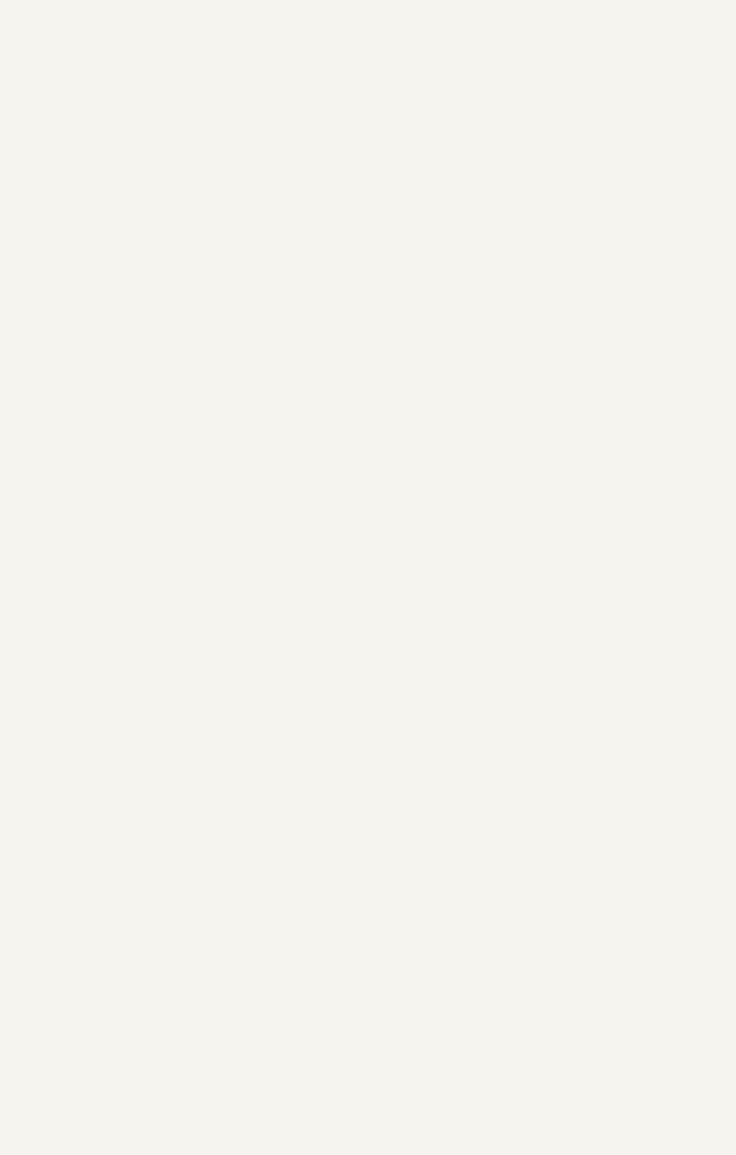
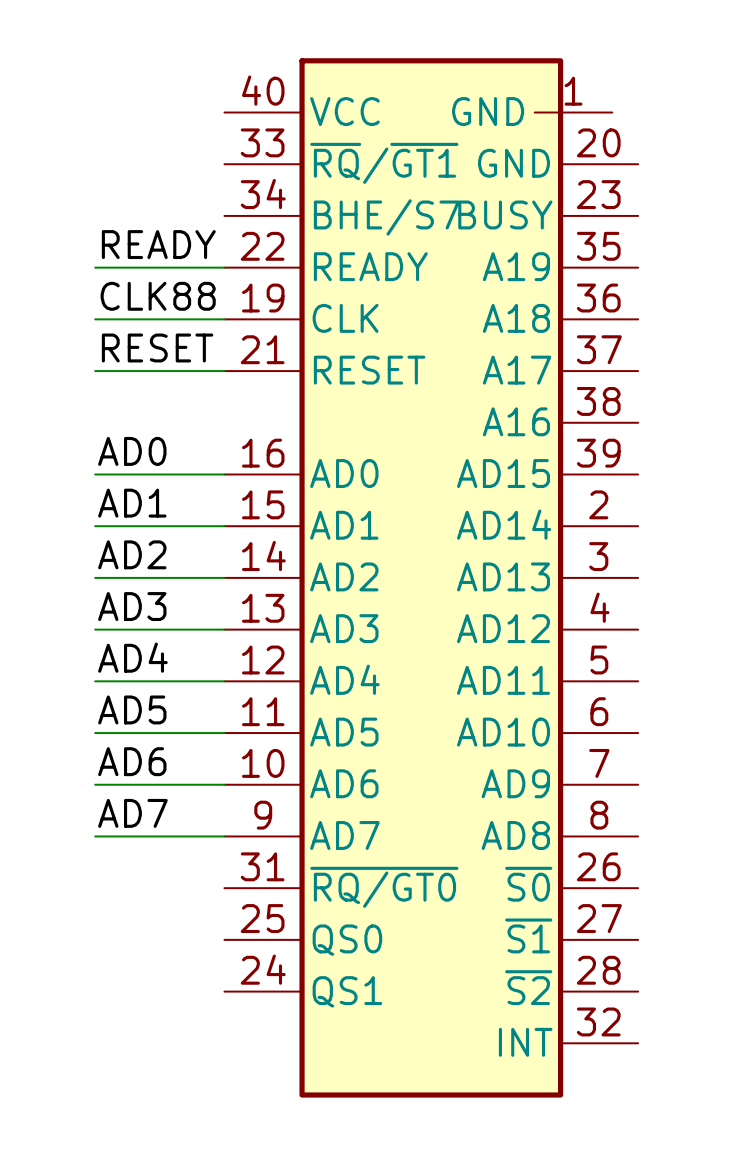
label: none -> READY (158, 244)
wire: none -> (95, 267) (224, 267)
label: none -> CLK88 (158, 296)
wire: none -> (95, 319) (224, 319)
label: none -> RESET (157, 347)
wire: none -> (95, 371) (224, 371)
label: none -> AD0 (132, 451)
wire: none -> (95, 474) (224, 474)
label: none -> AD1 (132, 503)
wire: none -> (95, 526) (224, 526)
label: none -> AD2 (132, 554)
wire: none -> (95, 577) (224, 577)
part: none -> (431, 577)
label: none -> AD3 (132, 606)
wire: none -> (95, 629) (224, 629)
label: none -> AD4 (132, 657)
wire: none -> (95, 681) (224, 681)
label: none -> AD5 (132, 709)
wire: none -> (95, 733) (224, 733)
label: none -> AD6 (132, 761)
wire: none -> (95, 784) (224, 784)
label: none -> AD7 (132, 813)
wire: none -> (95, 836) (224, 836)

